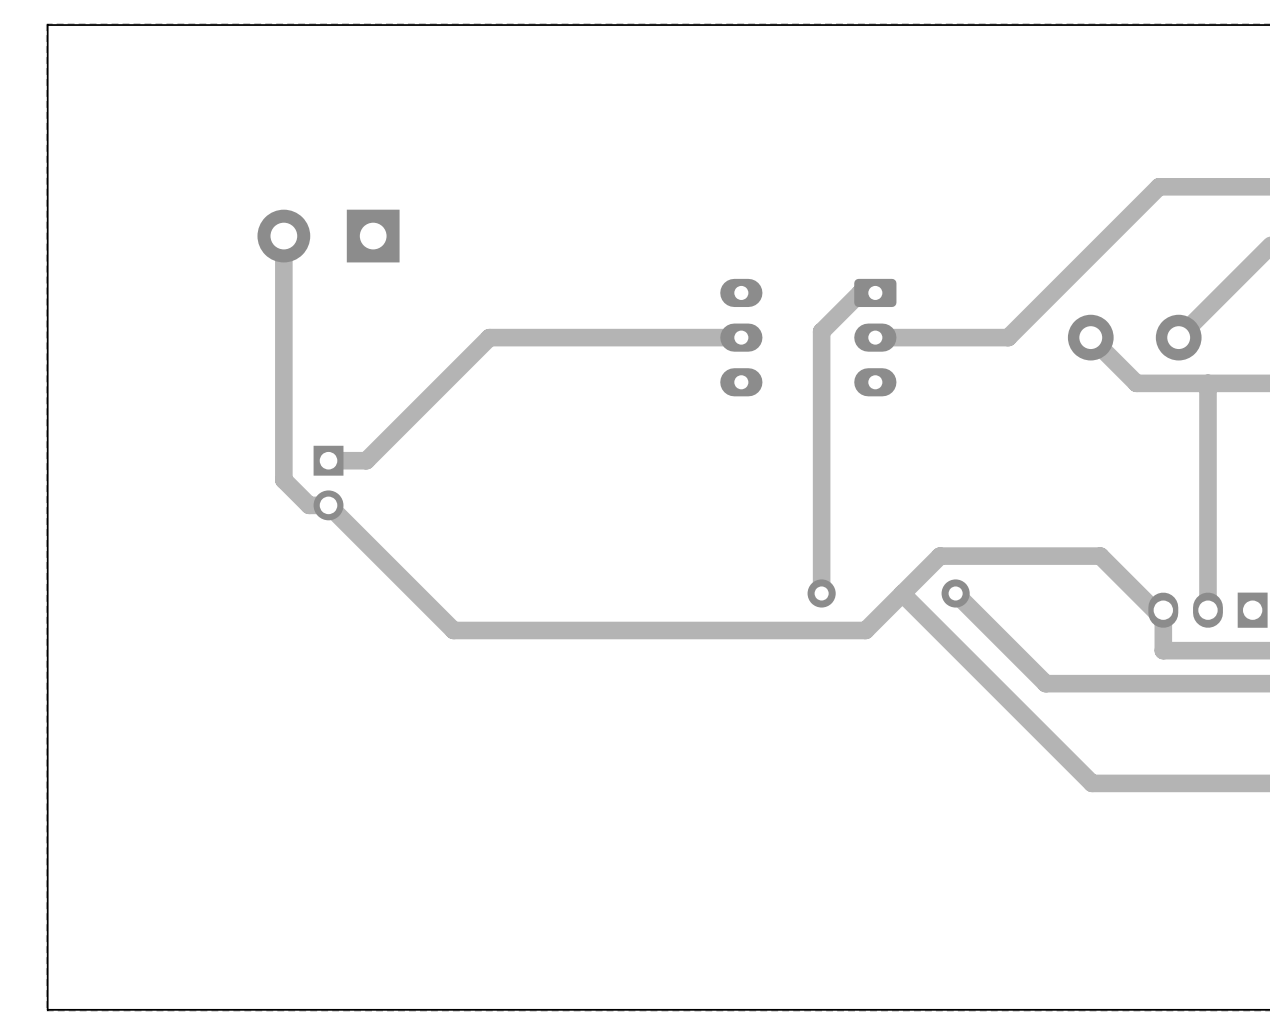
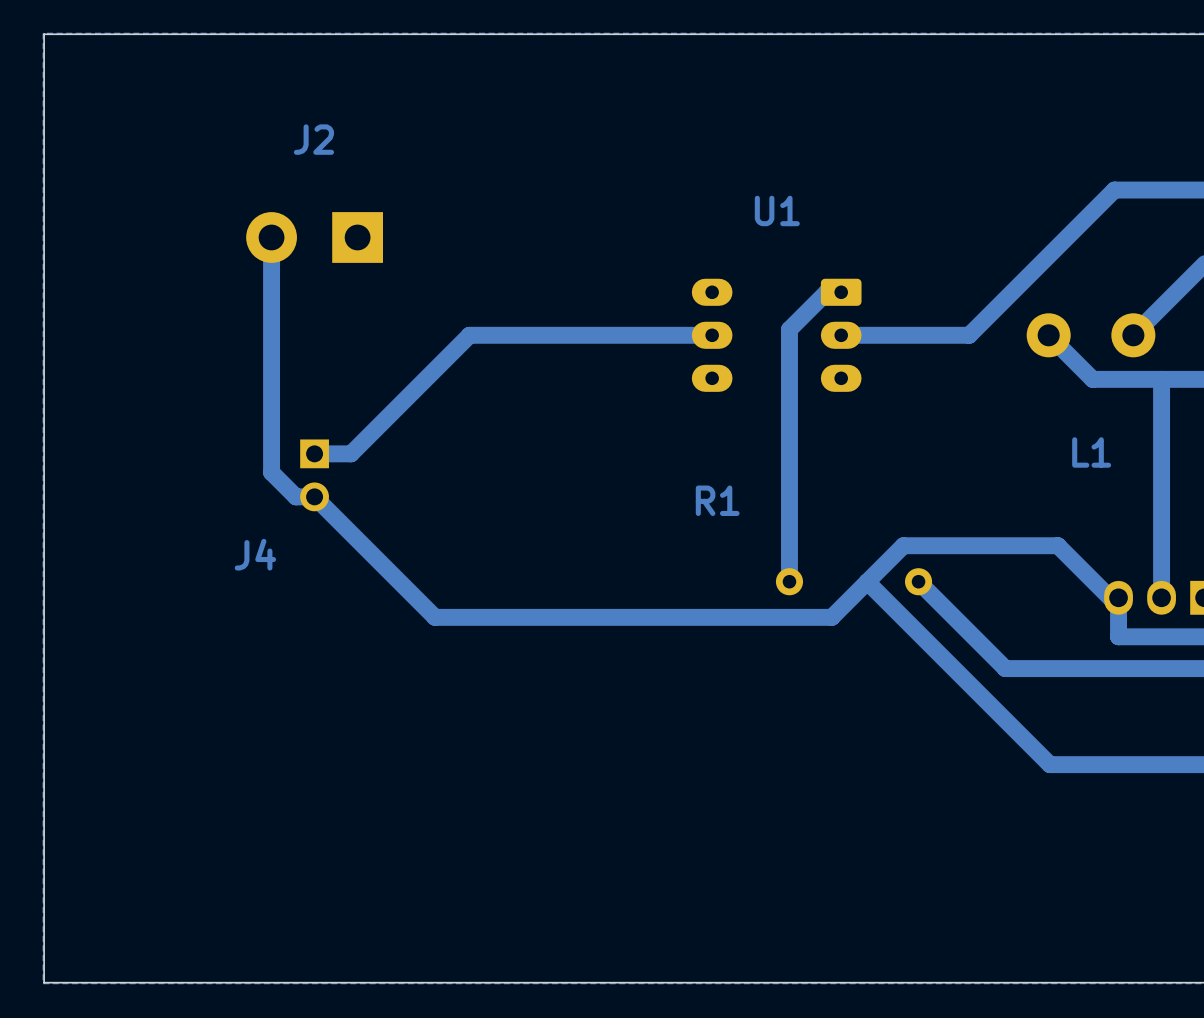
text: none -> J2 (313, 139)
text: none -> U1 (777, 210)
text: none -> L1 (1091, 452)
text: none -> R1 (717, 500)
text: none -> J4 (255, 554)

